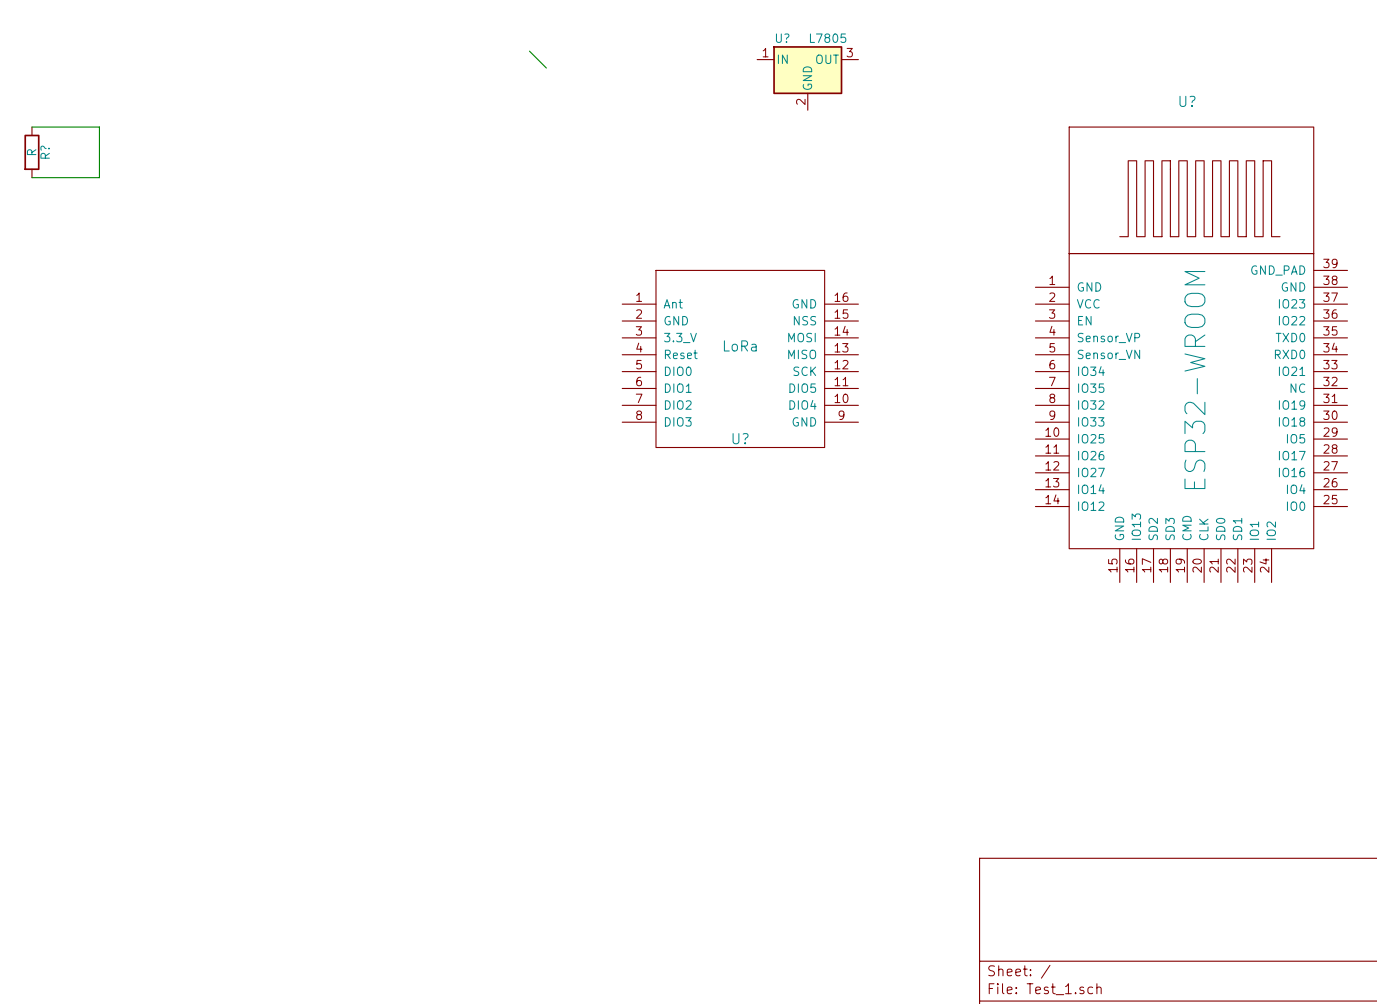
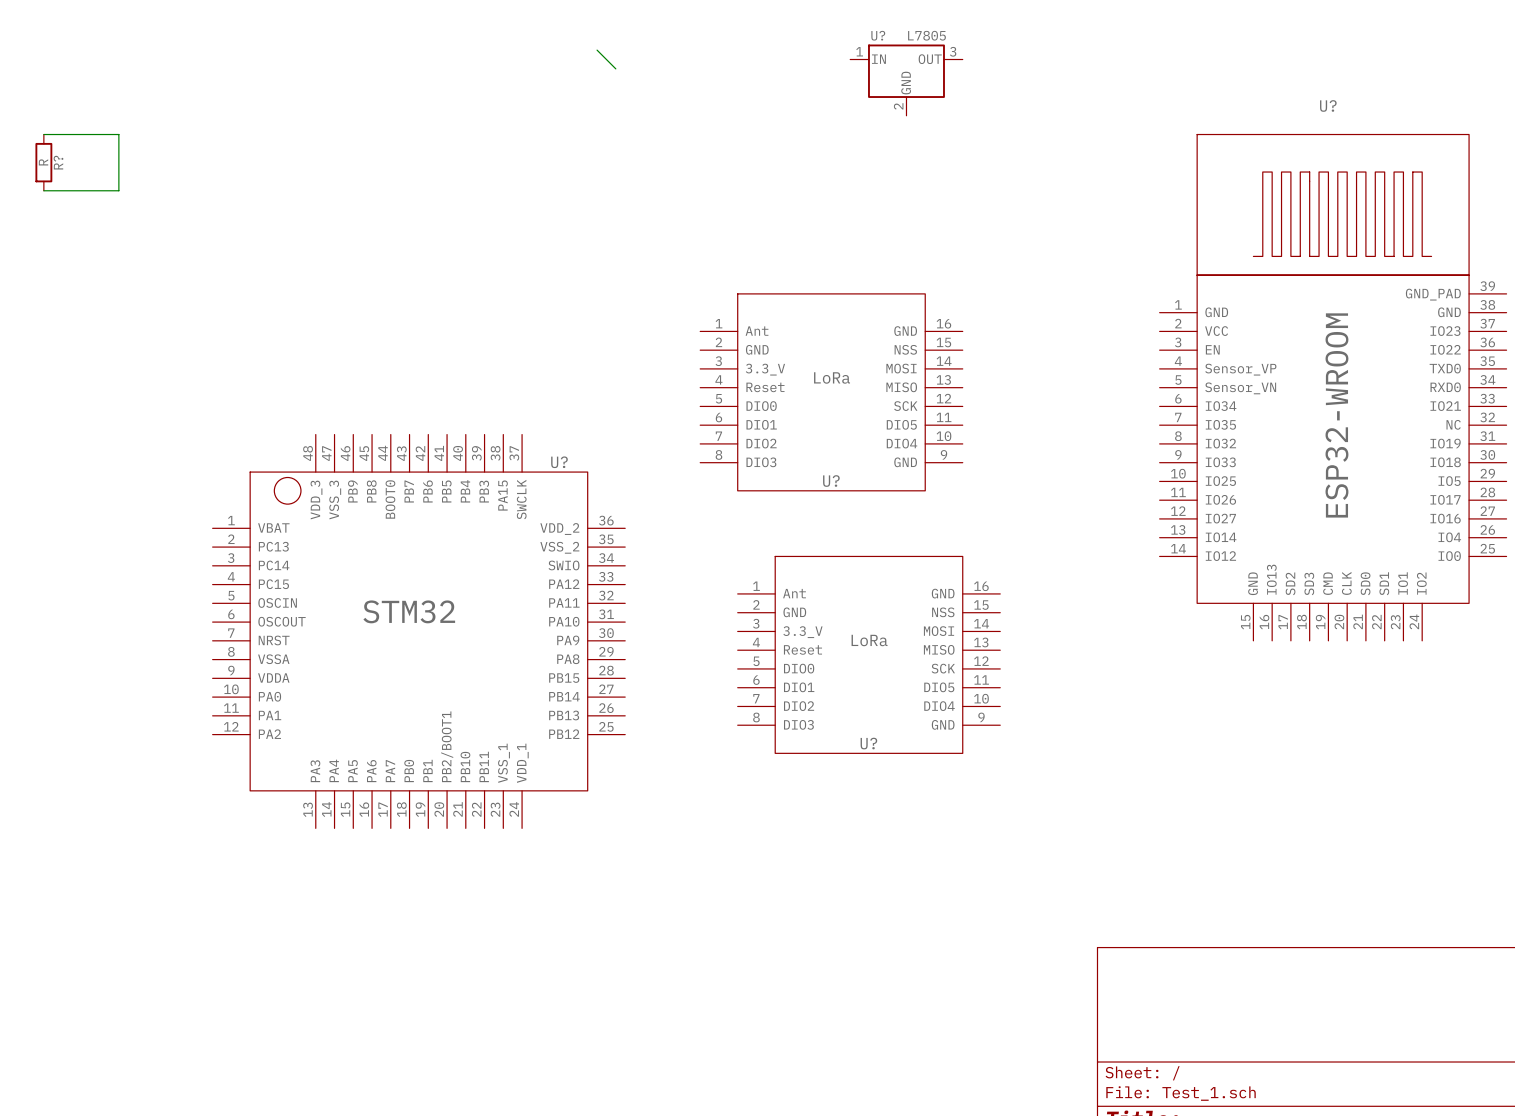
U?: none -> STM32 (418, 631)
U?: none -> LoRa (868, 654)

